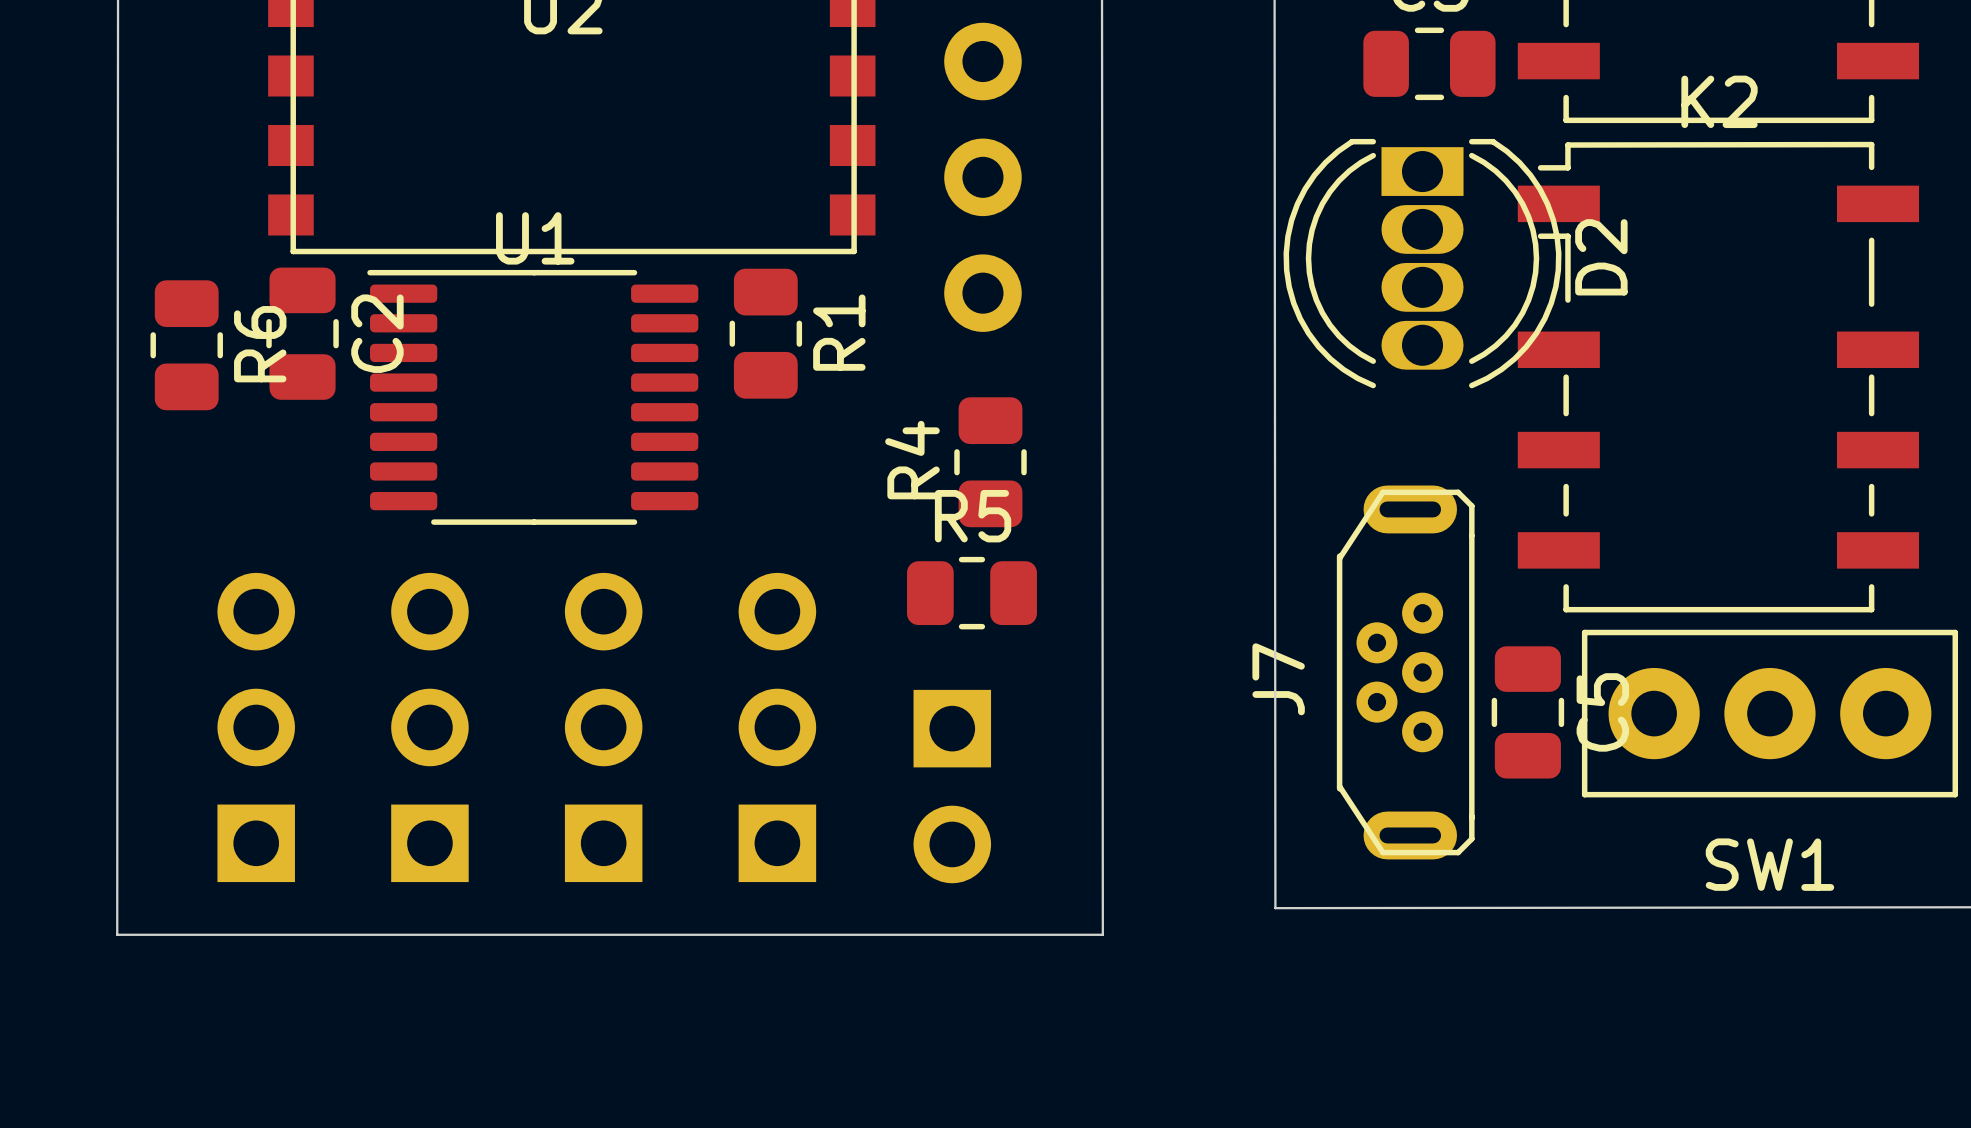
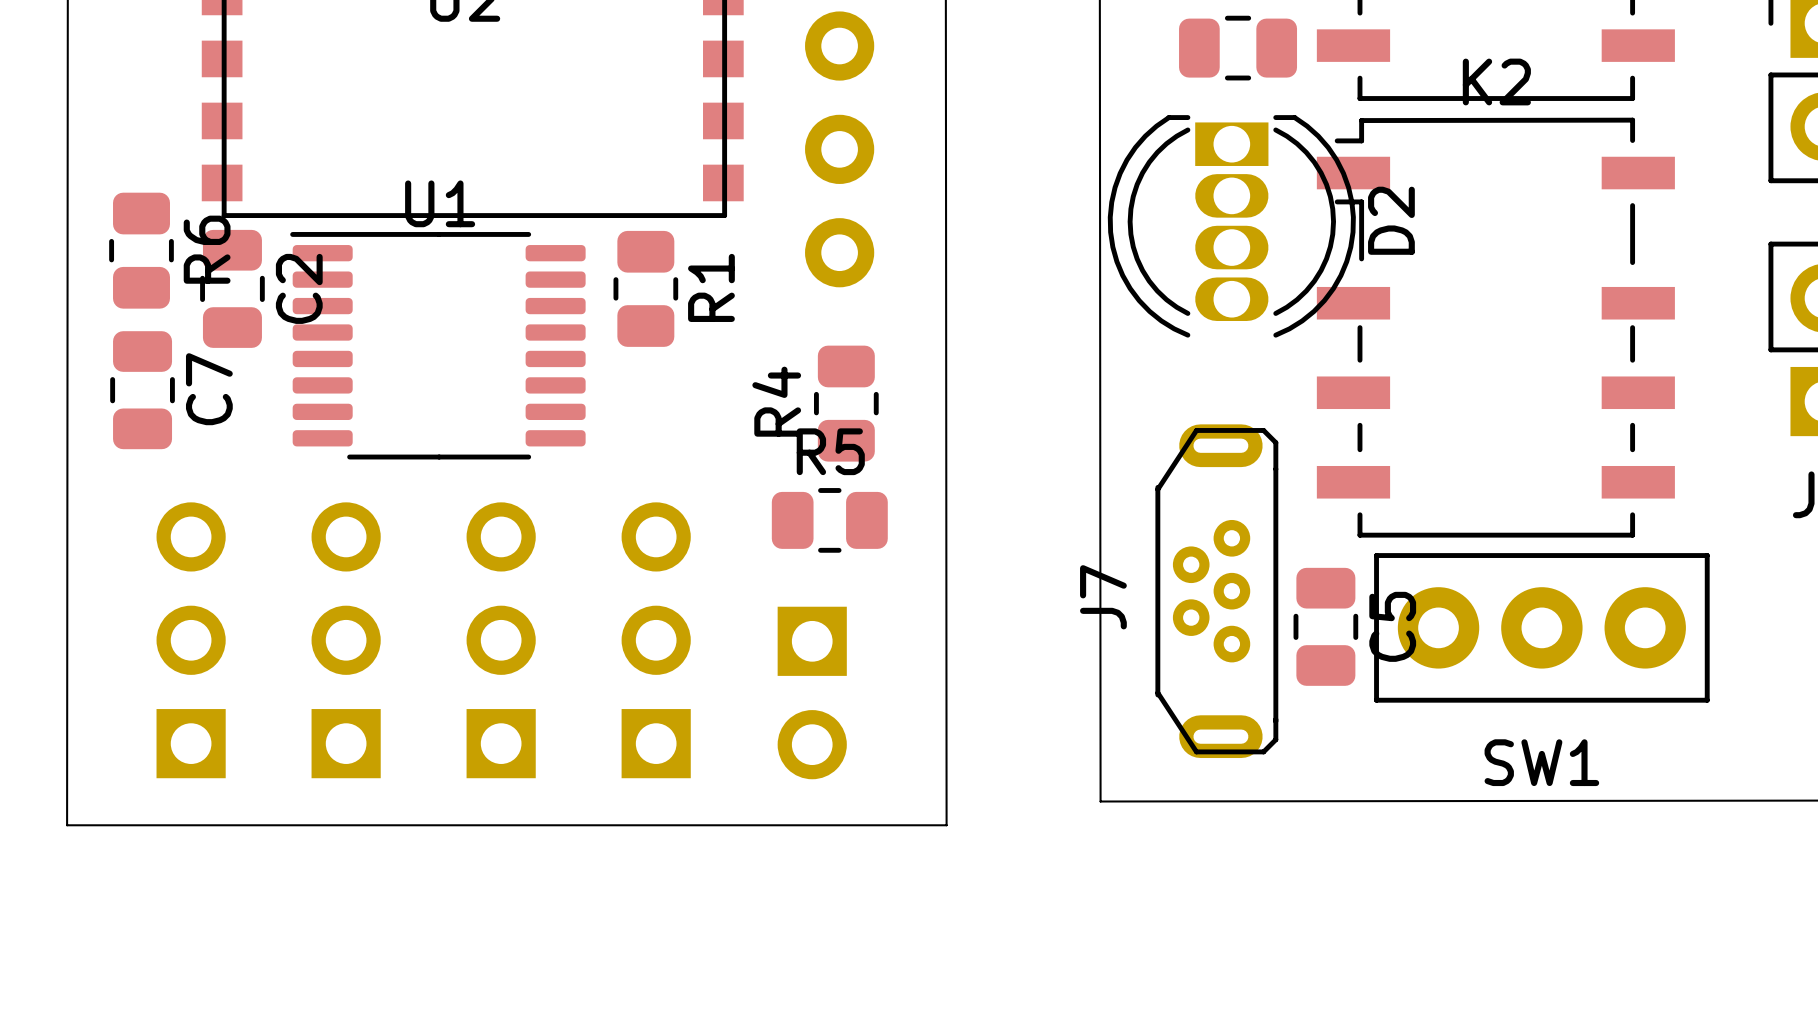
R6 position: (186, 345) -> (141, 250)
C7: none -> (142, 390)

